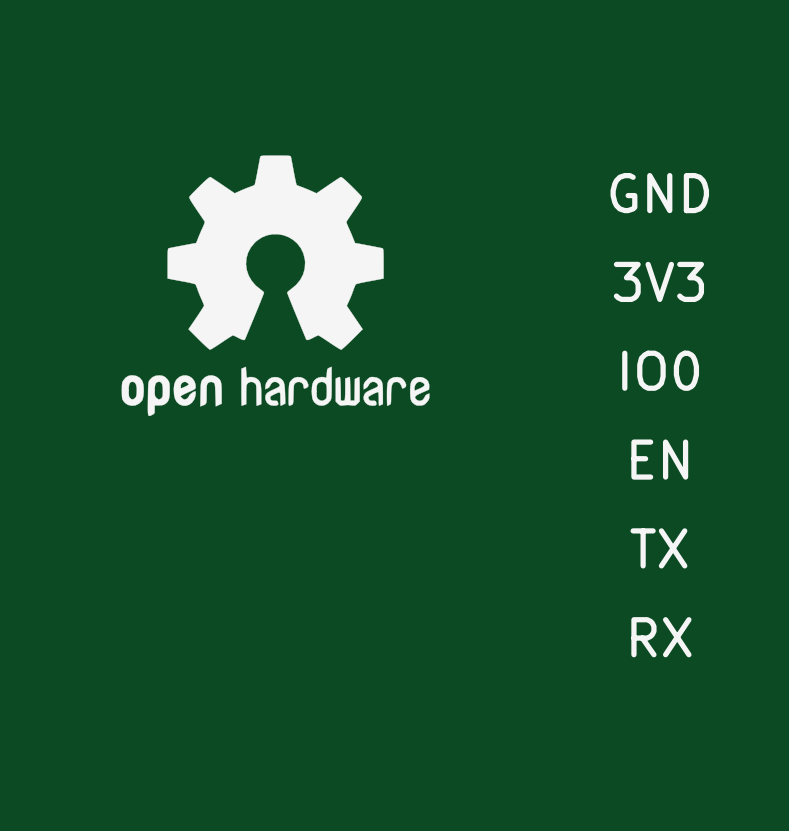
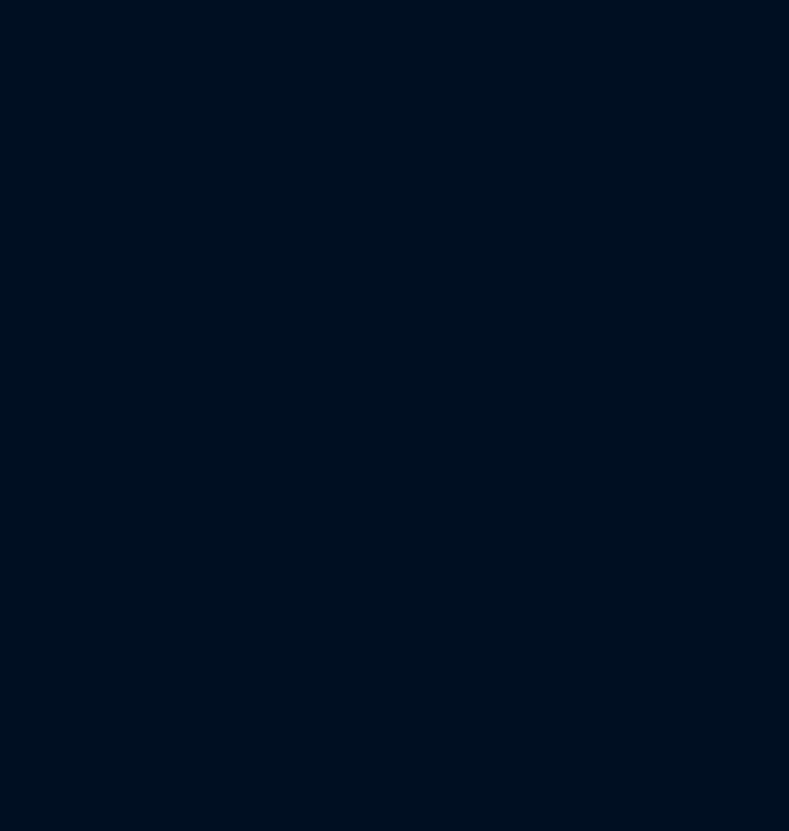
drawing: [121, 155, 430, 417] -> none
text: GND (659, 193) -> none
text: 3V3 (658, 281) -> none
text: IO0 (660, 370) -> none
text: EN (659, 459) -> none
text: TX (658, 548) -> none
text: RX (661, 637) -> none

